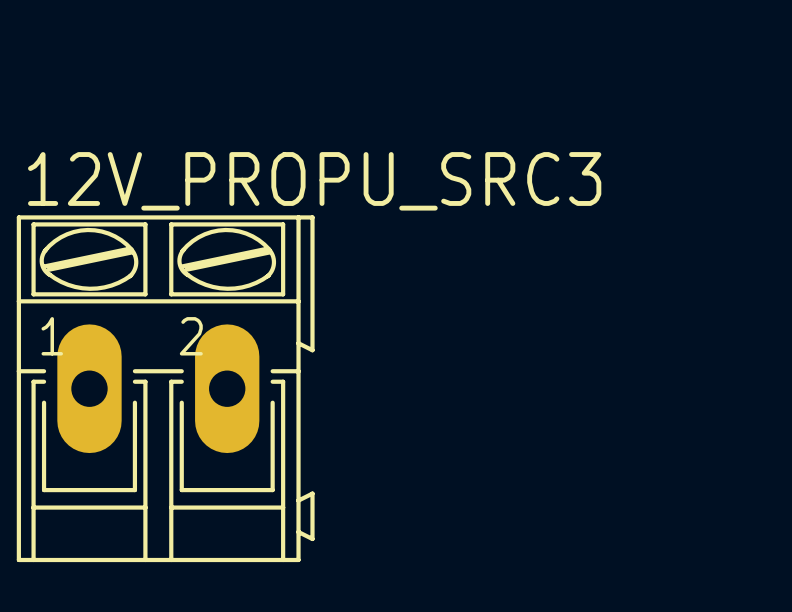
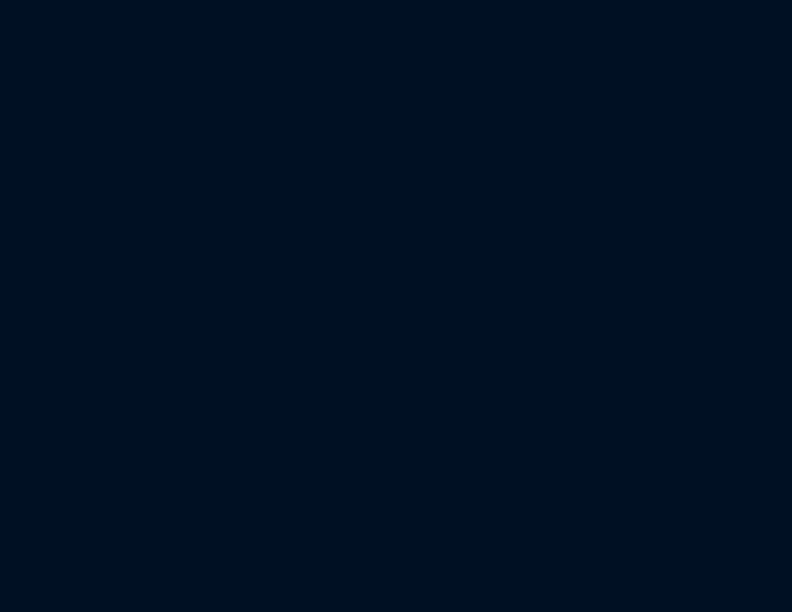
12V_PROPU_SRC3: (165, 388) -> none

